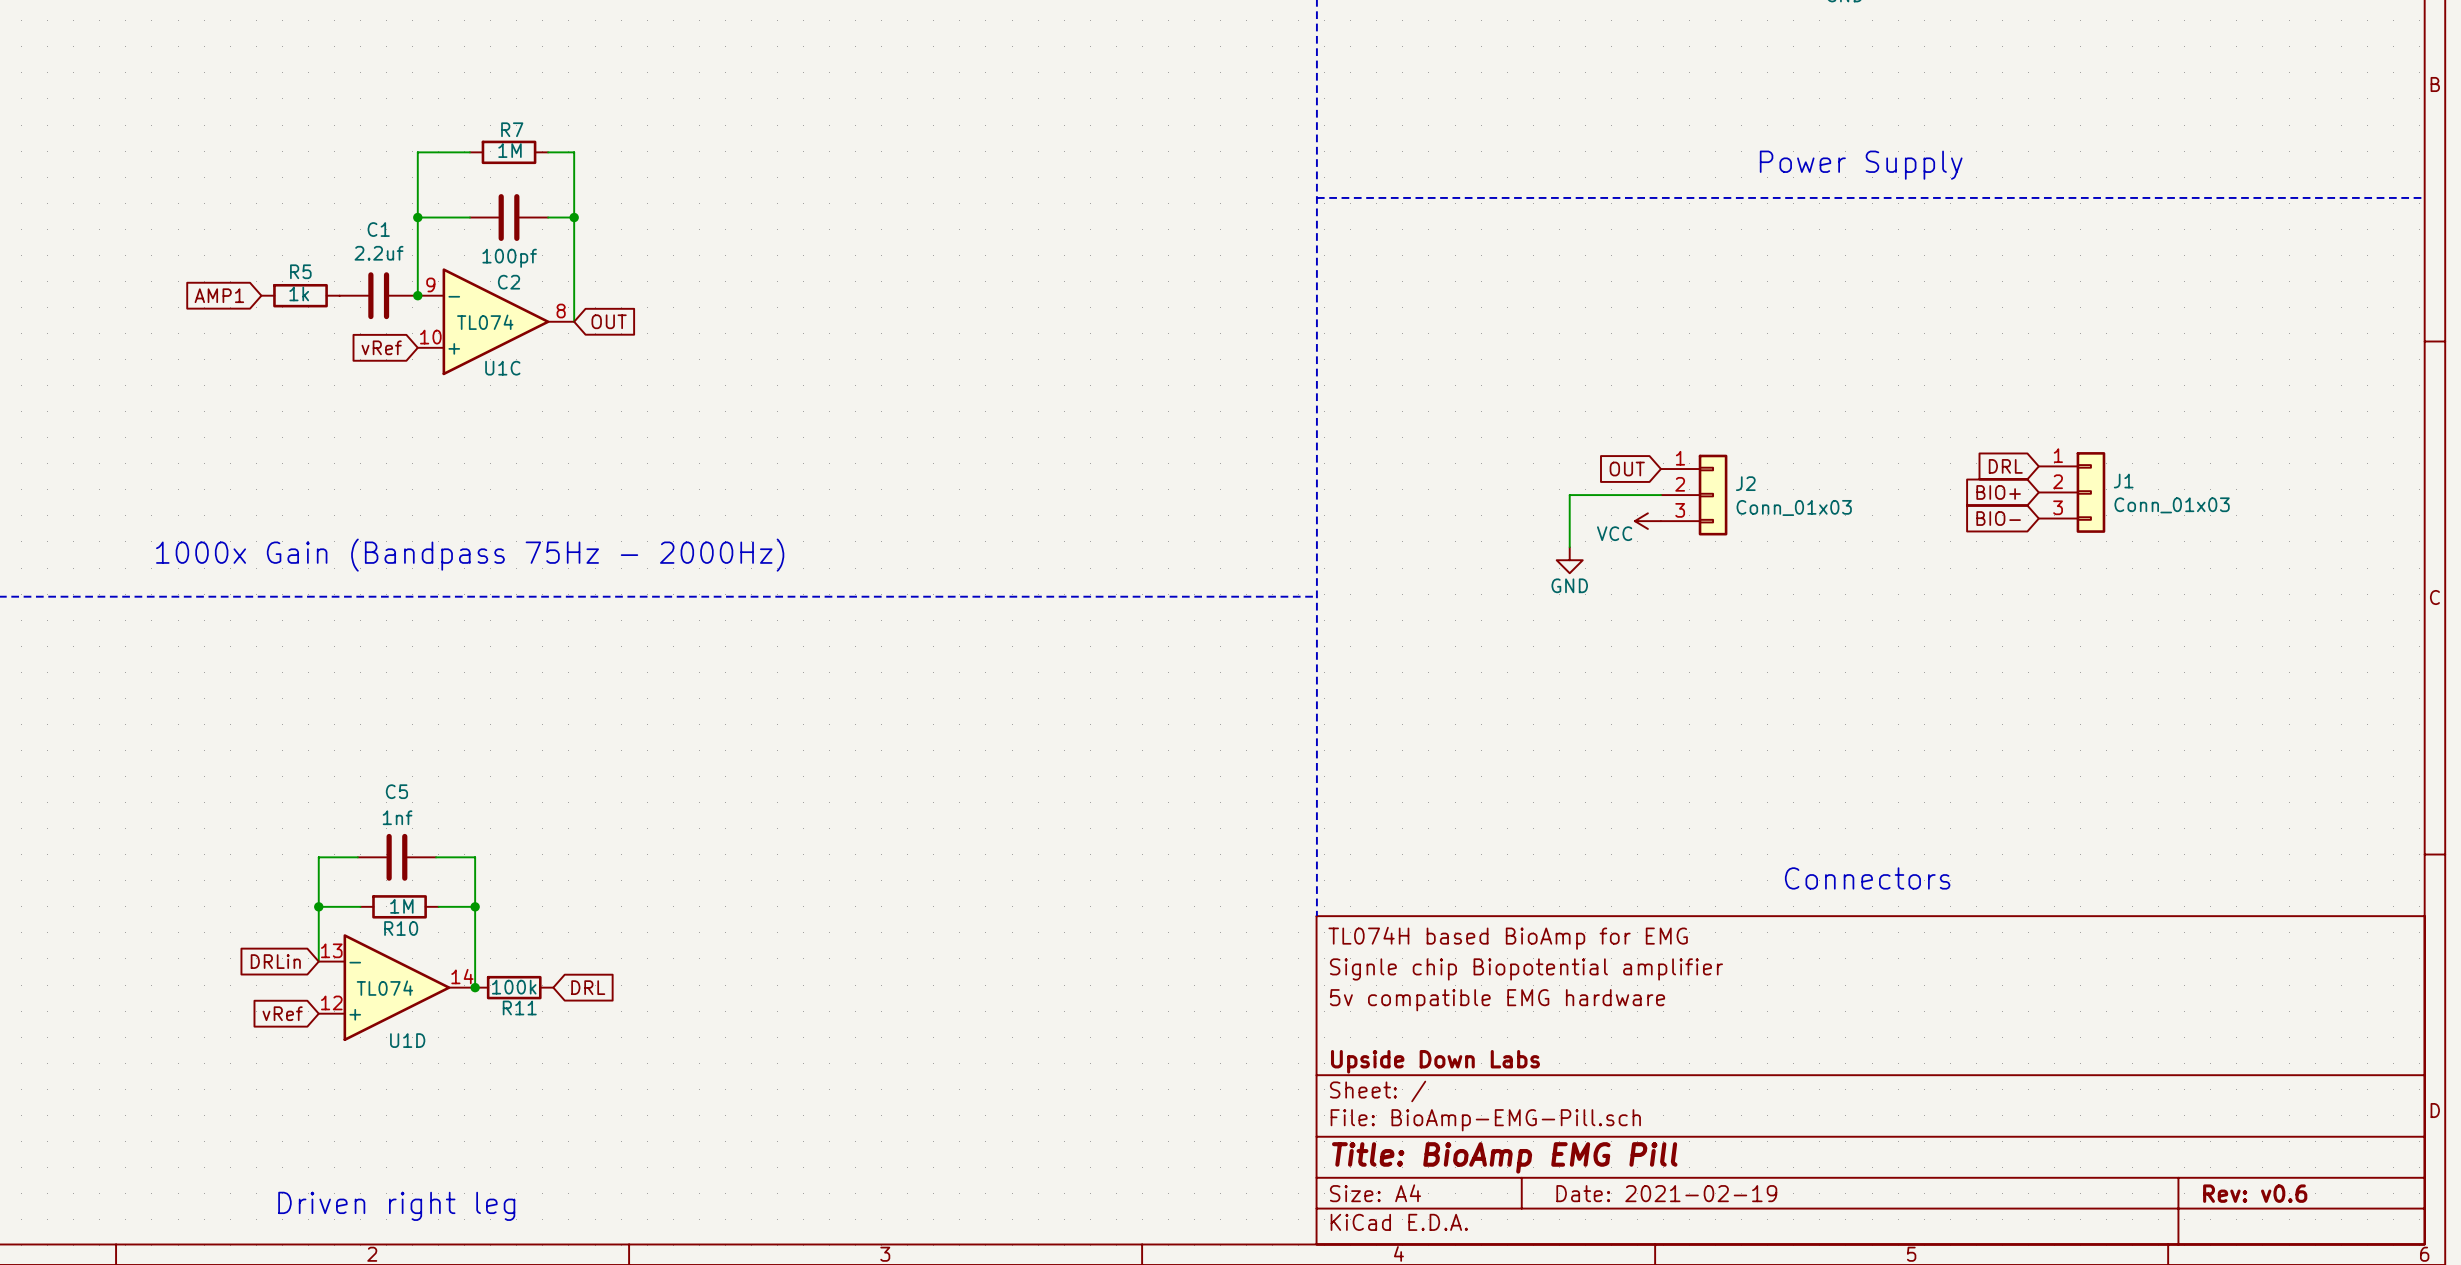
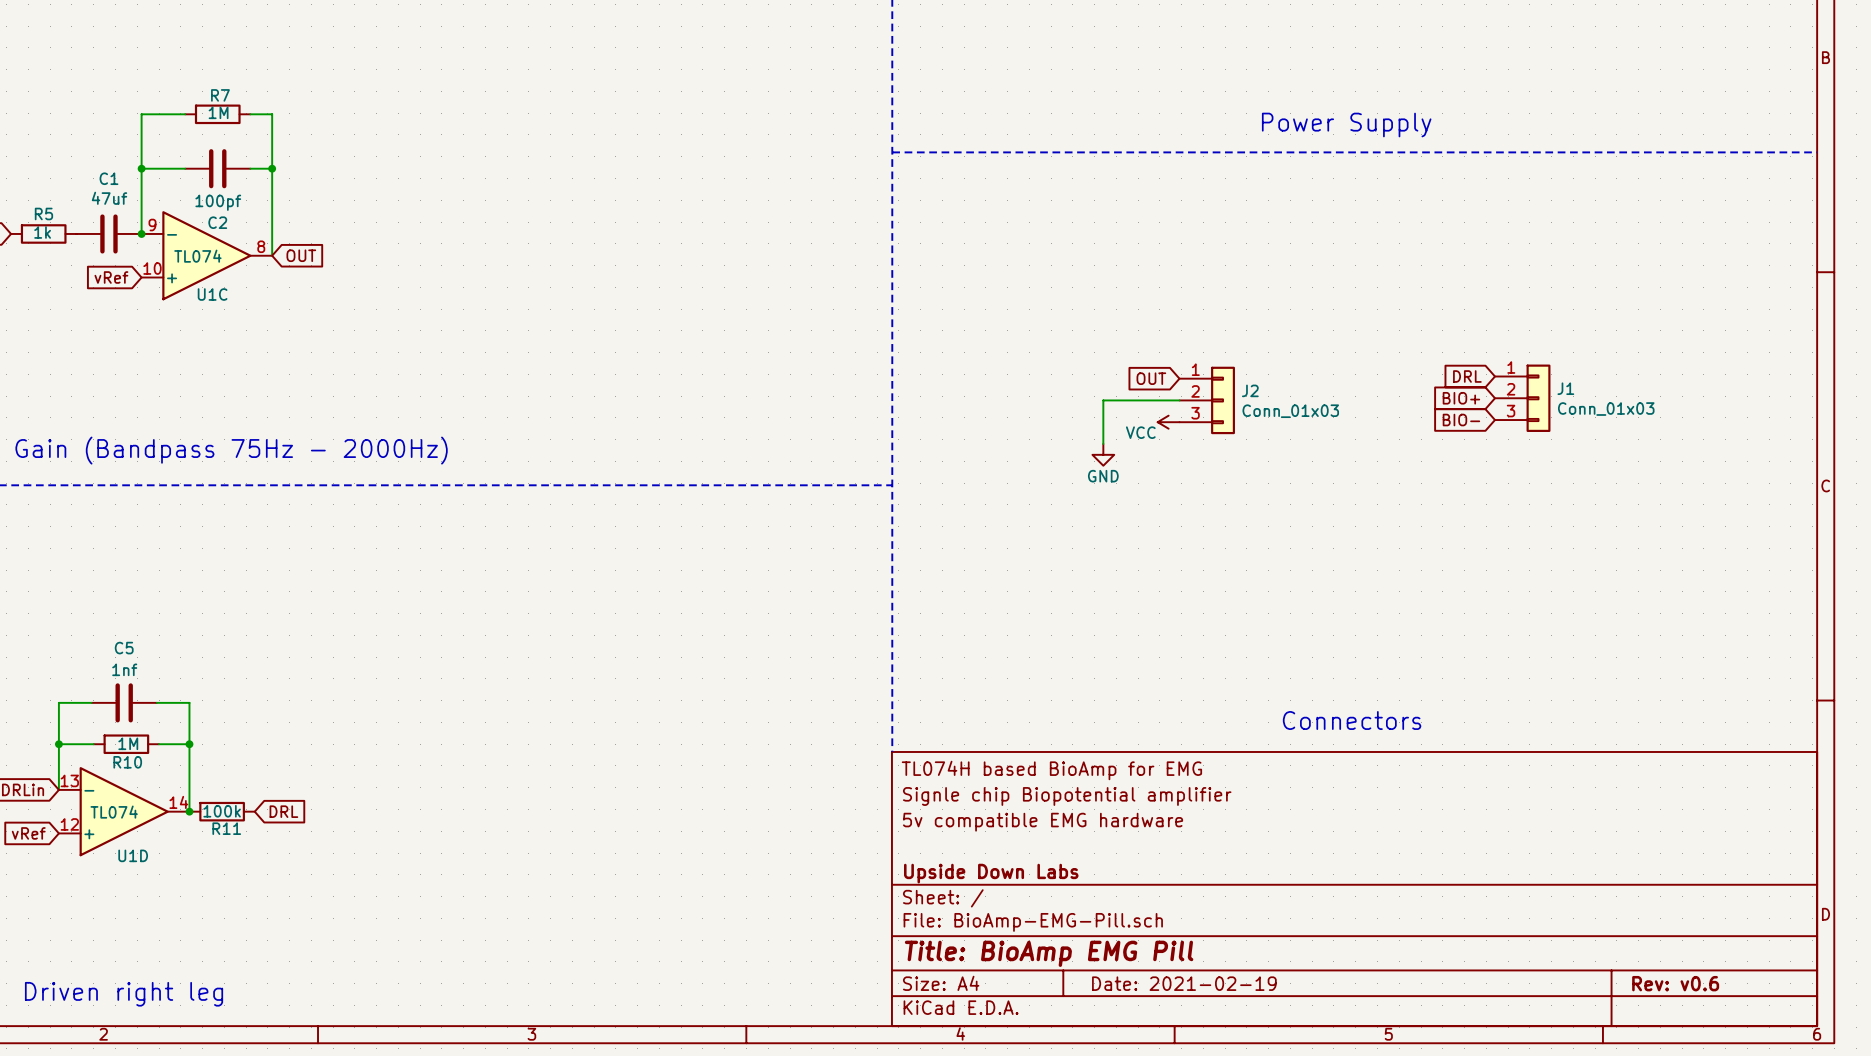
C1 value: 2.2uf (379, 253) -> 47uf (109, 198)

